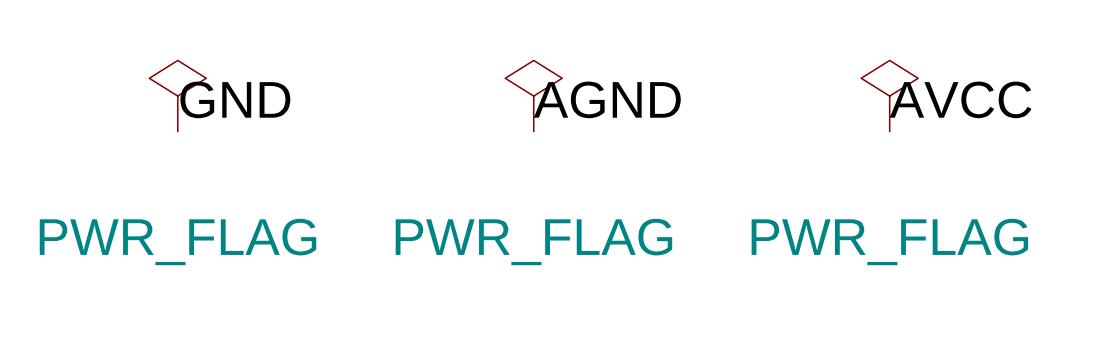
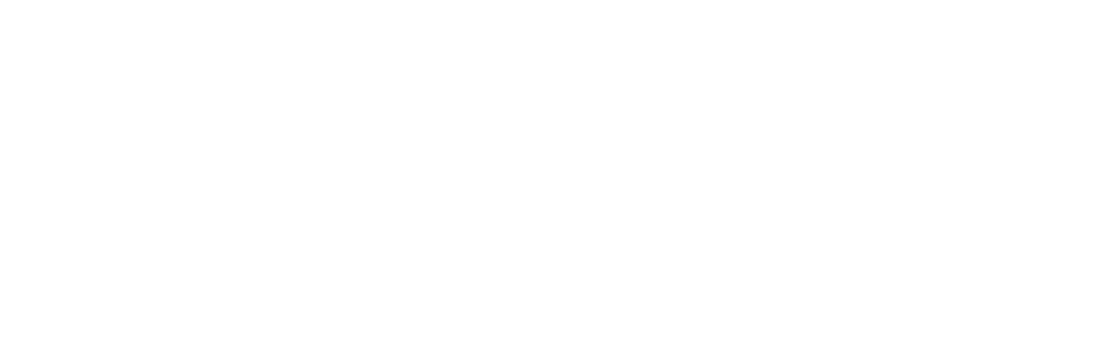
power symbol: PWR_FLAG (177, 96) -> none
power symbol: PWR_FLAG (533, 96) -> none
power symbol: PWR_FLAG (889, 96) -> none
label: GND (235, 99) -> none
label: AGND (607, 99) -> none
label: AVCC (960, 99) -> none

